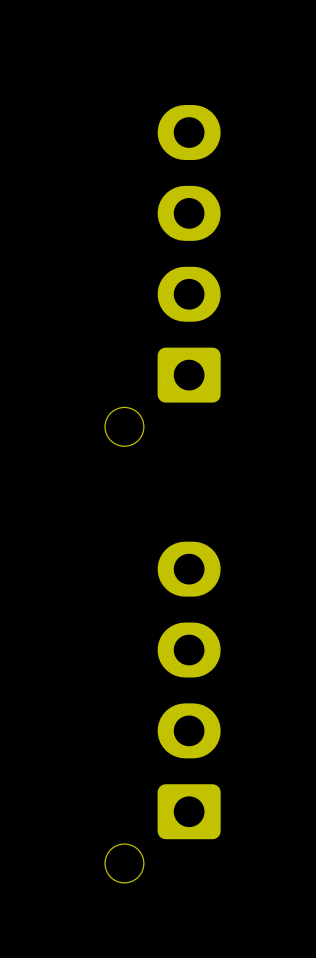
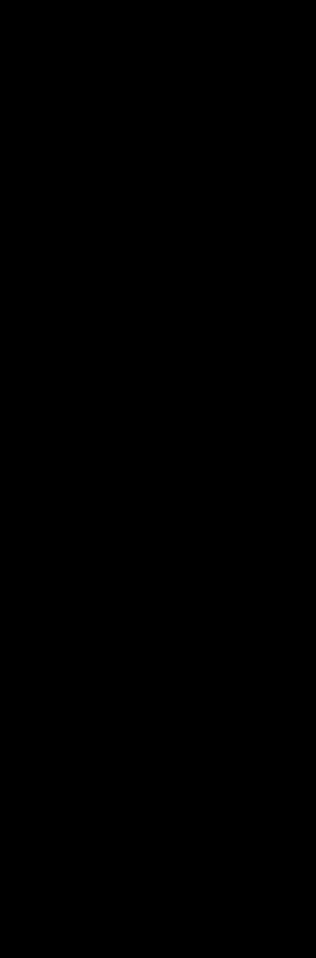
part: (162, 275) -> none
part: (162, 712) -> none

